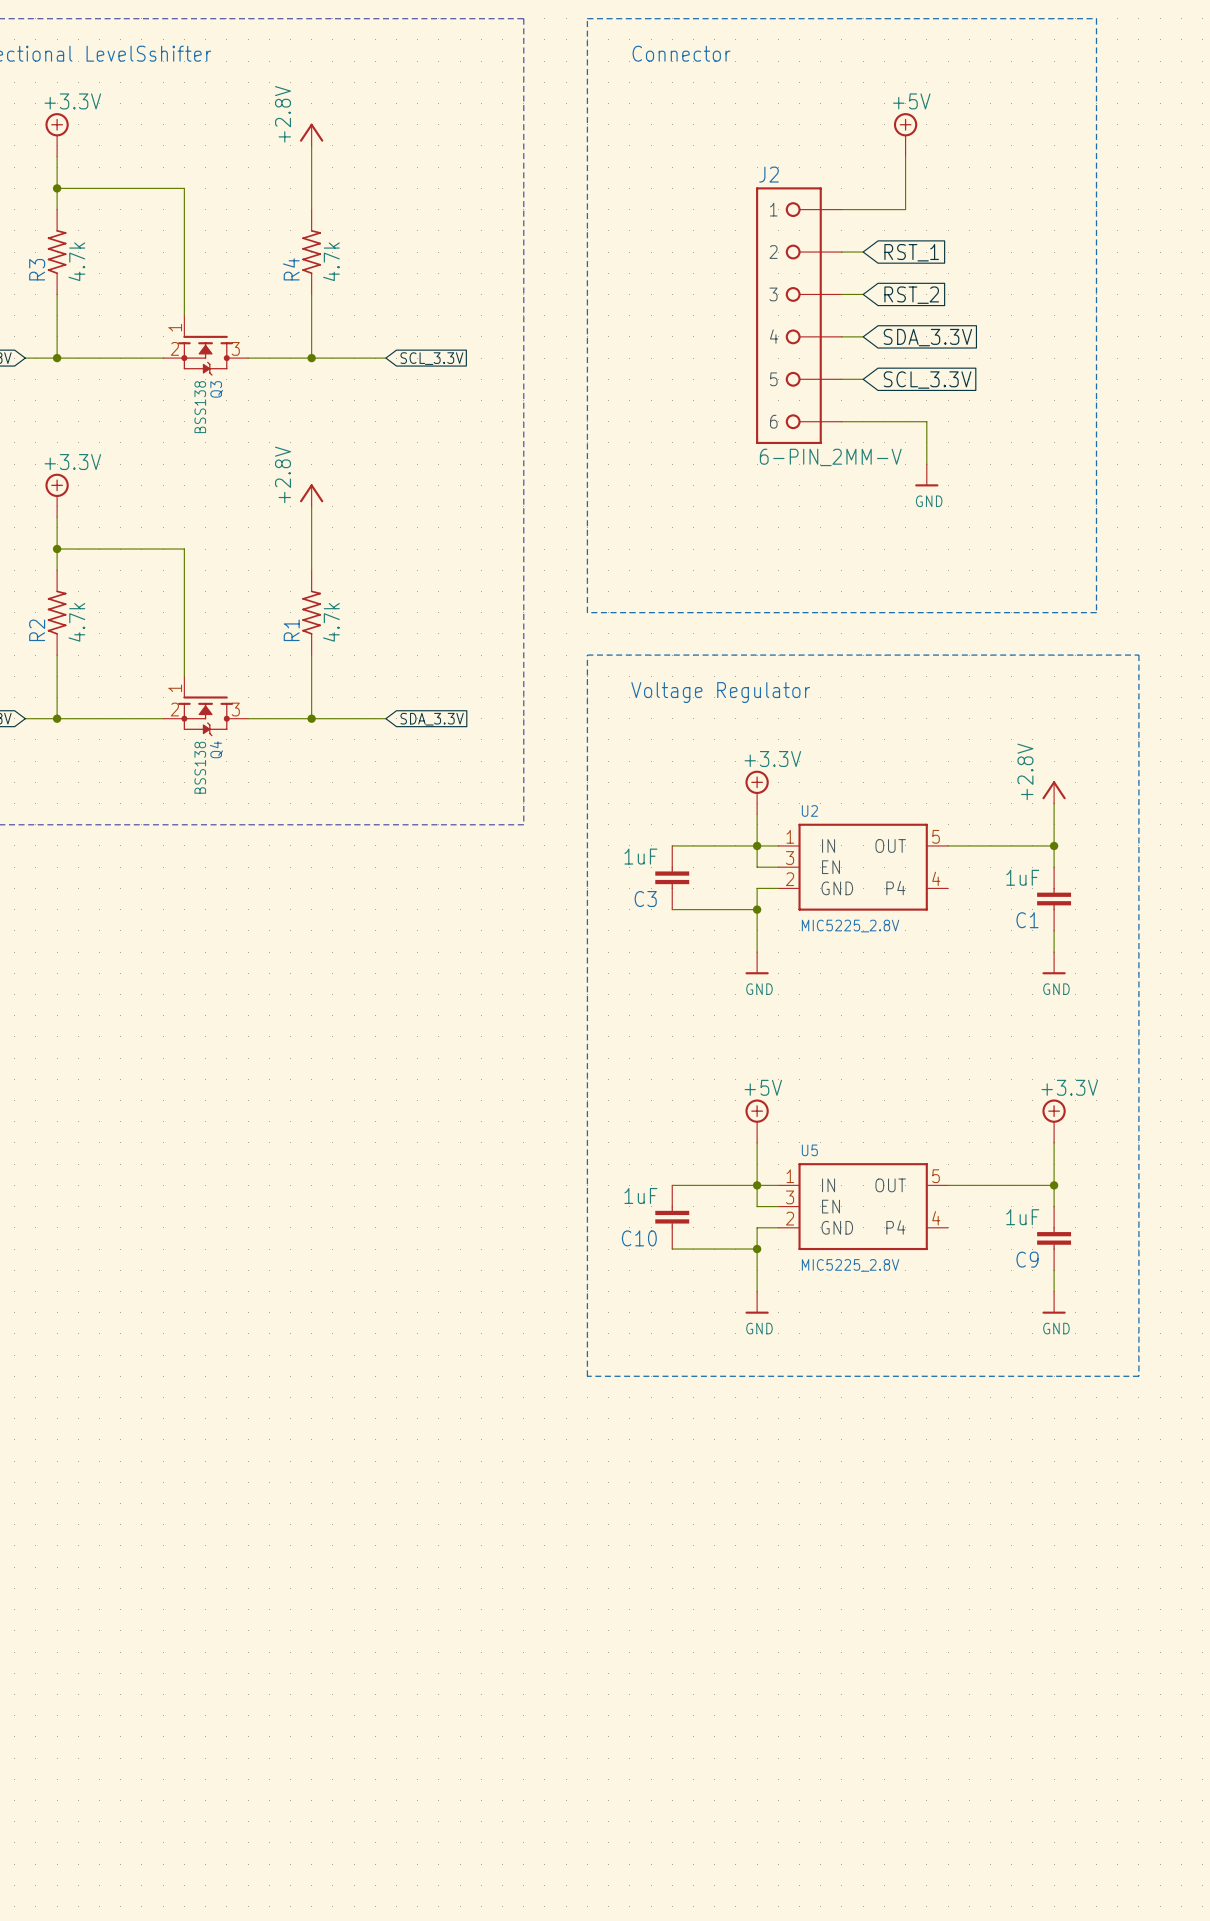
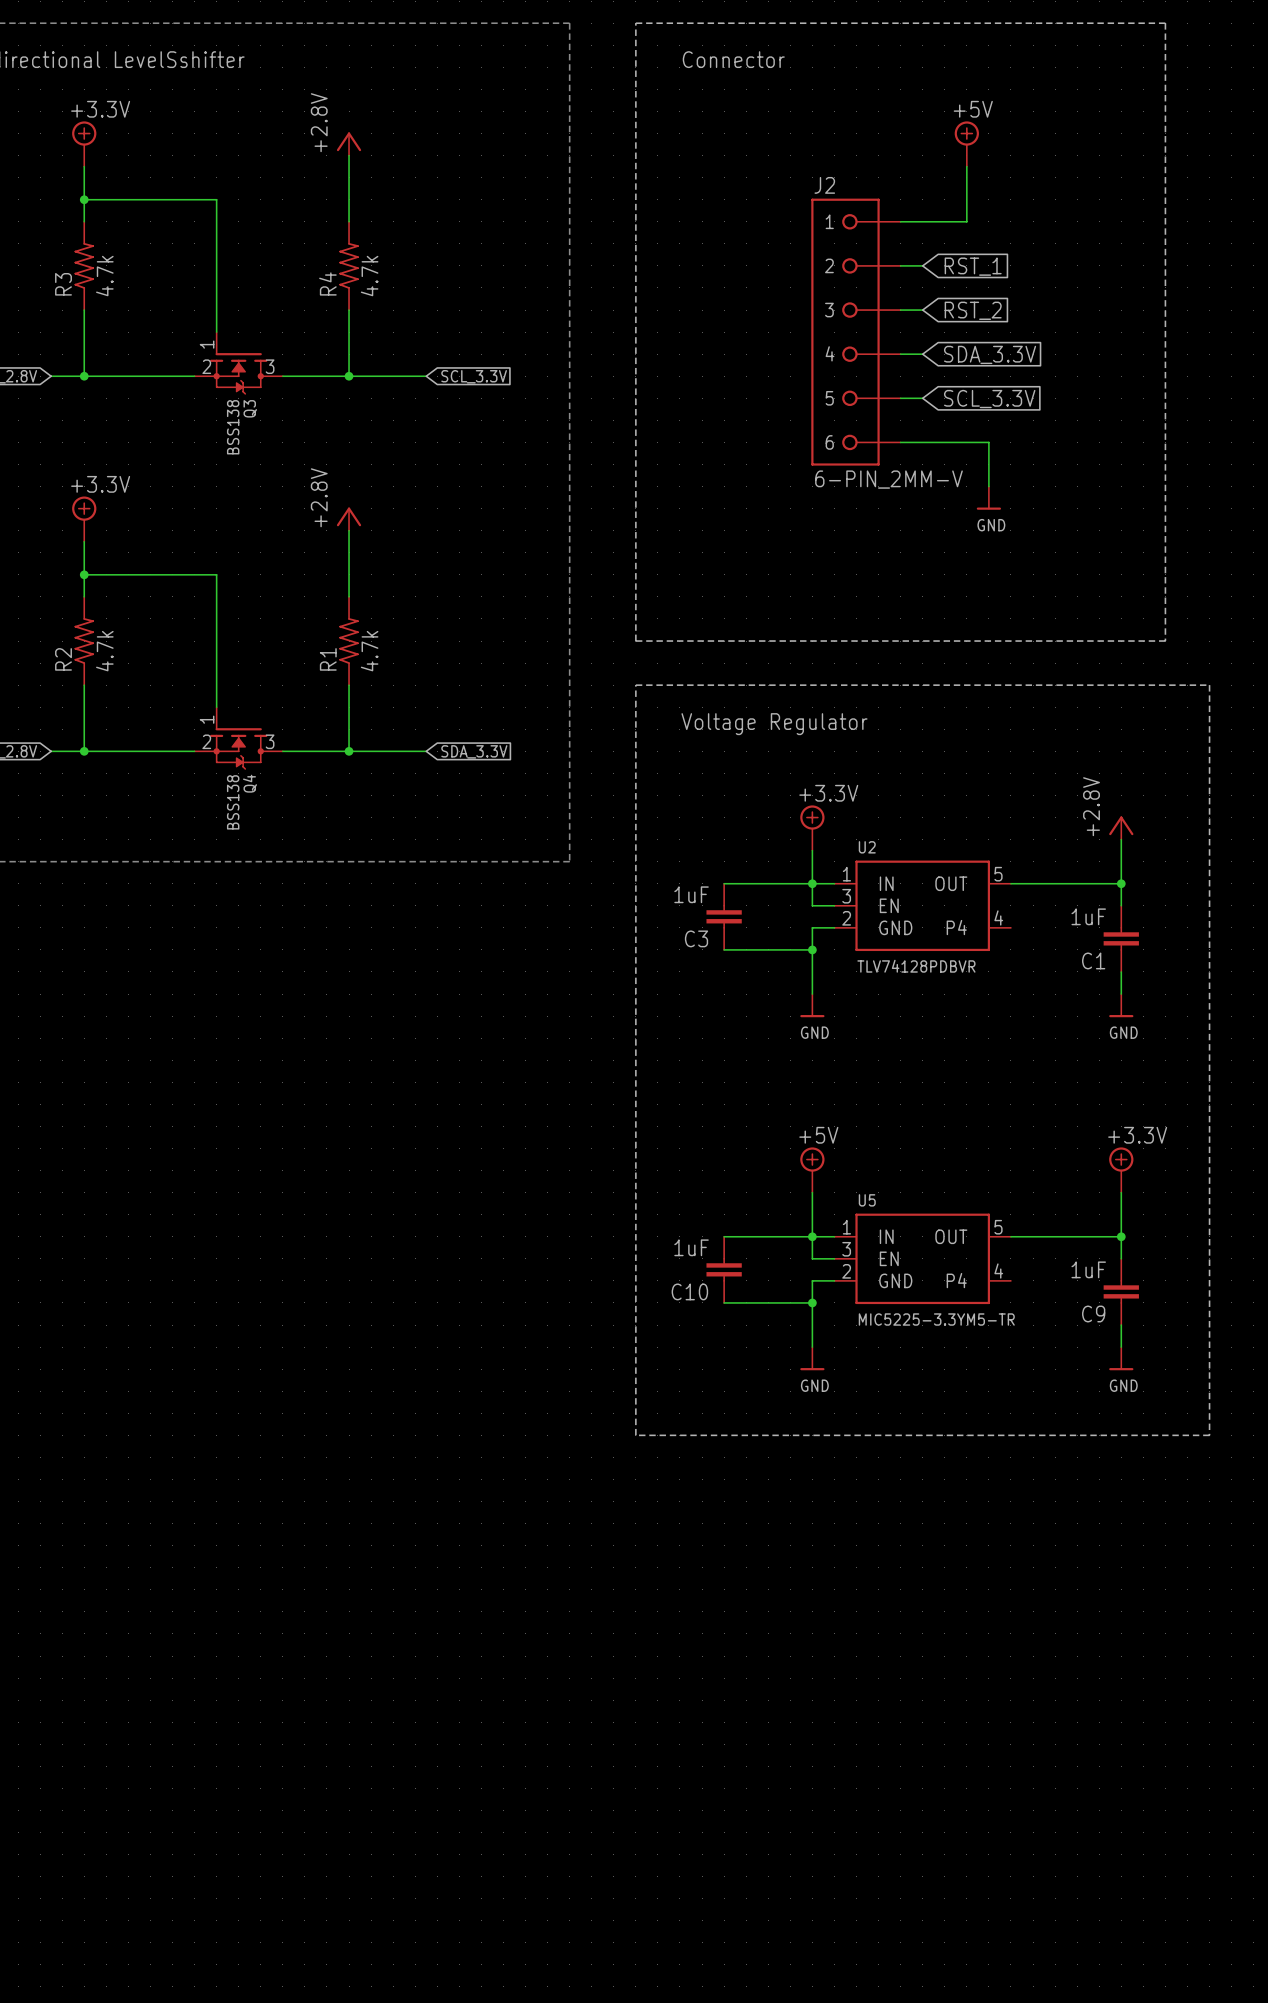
U2 value: MIC5225_2.8V (850, 926) -> TLV74128PDBVR (916, 966)
U5 value: MIC5225_2.8V (850, 1265) -> MIC5225-3.3YM5-TR (936, 1319)

